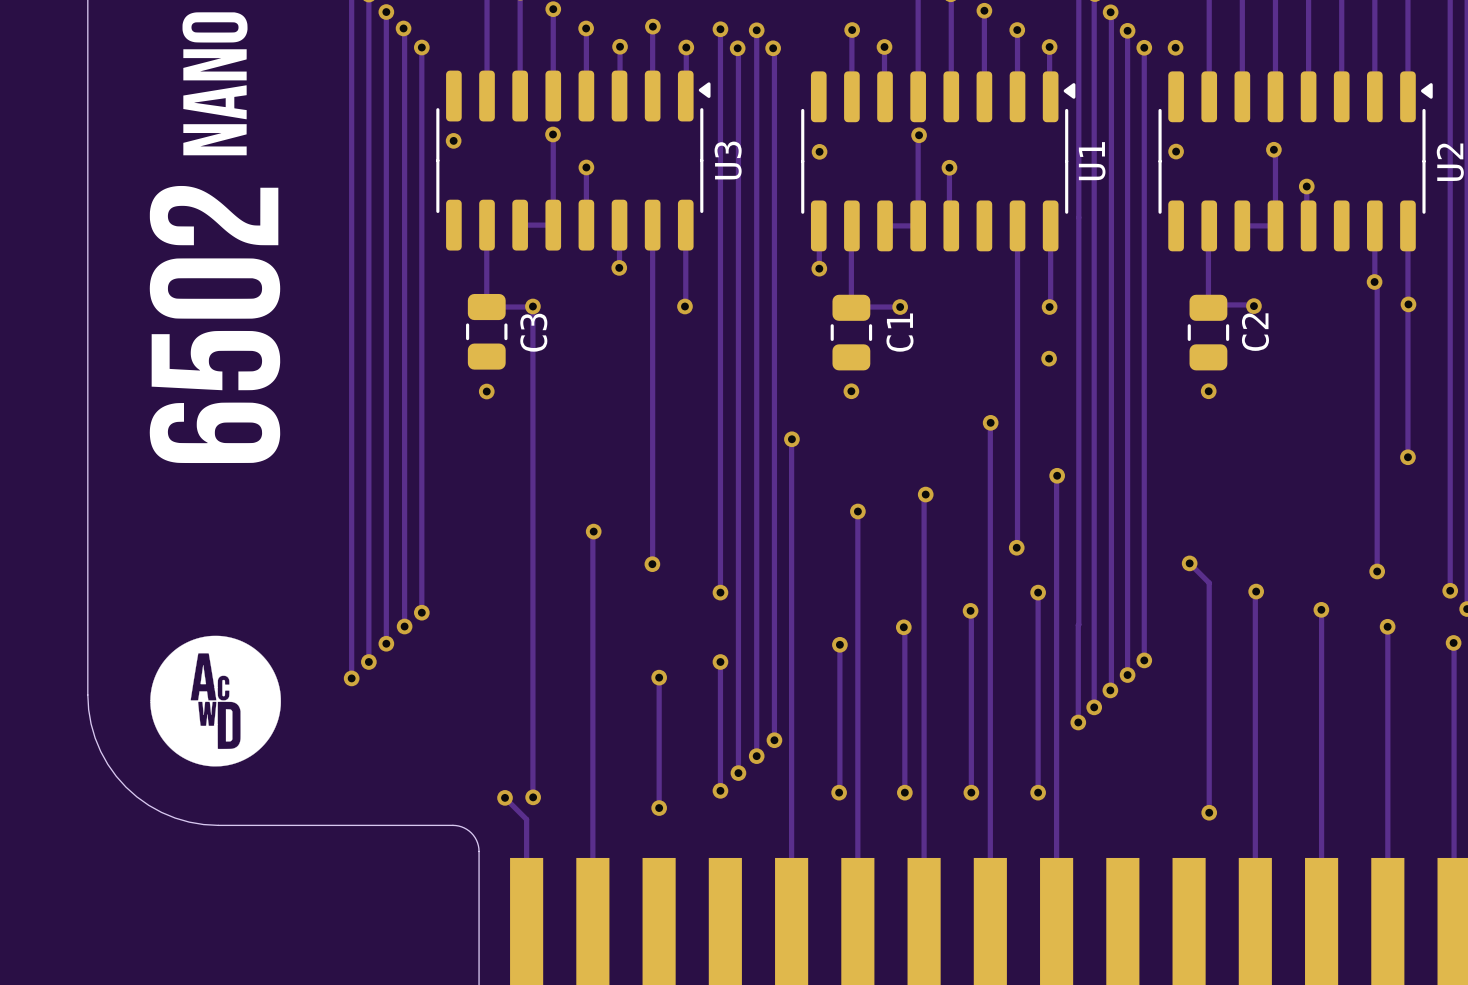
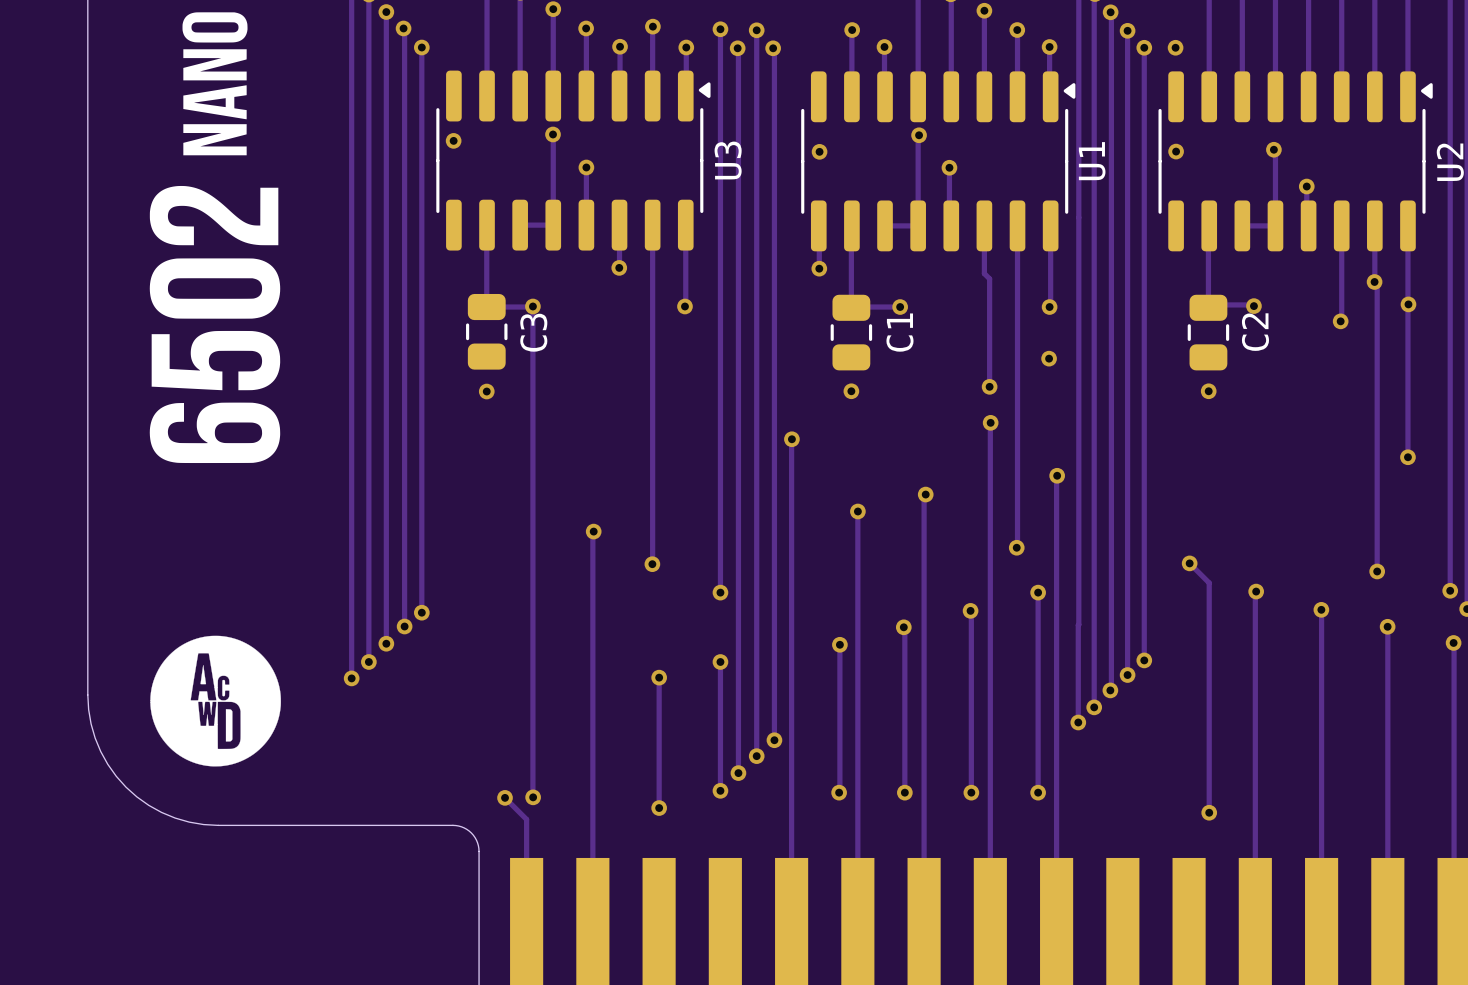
track: none -> (984, 225) (984, 273) (989, 278) (989, 386)
track: none -> (1341, 225) (1340, 321)
via: none -> (1340, 321)
via: none -> (989, 386)

